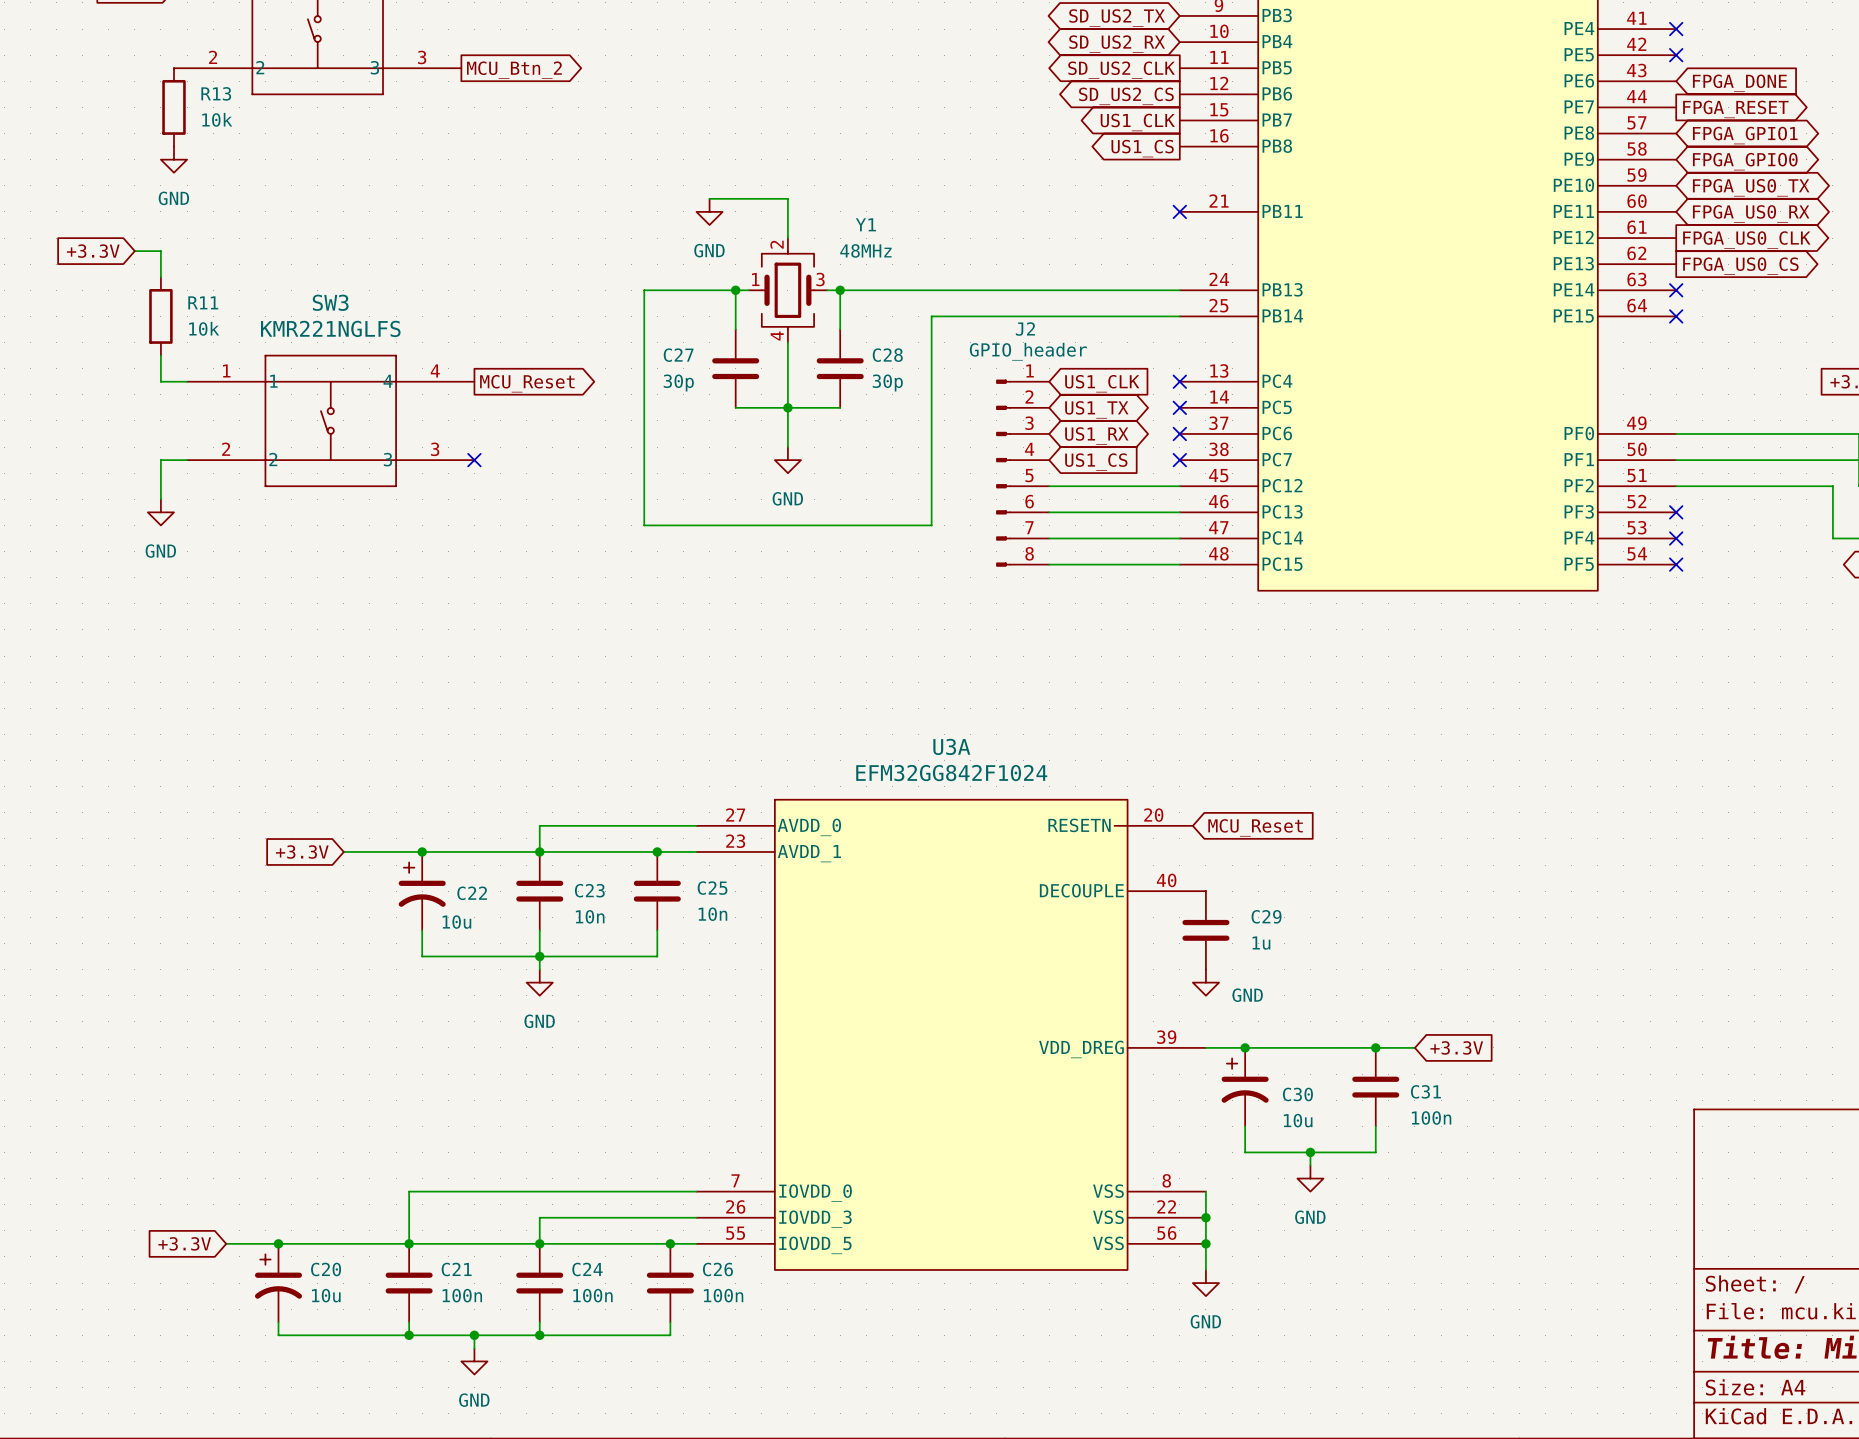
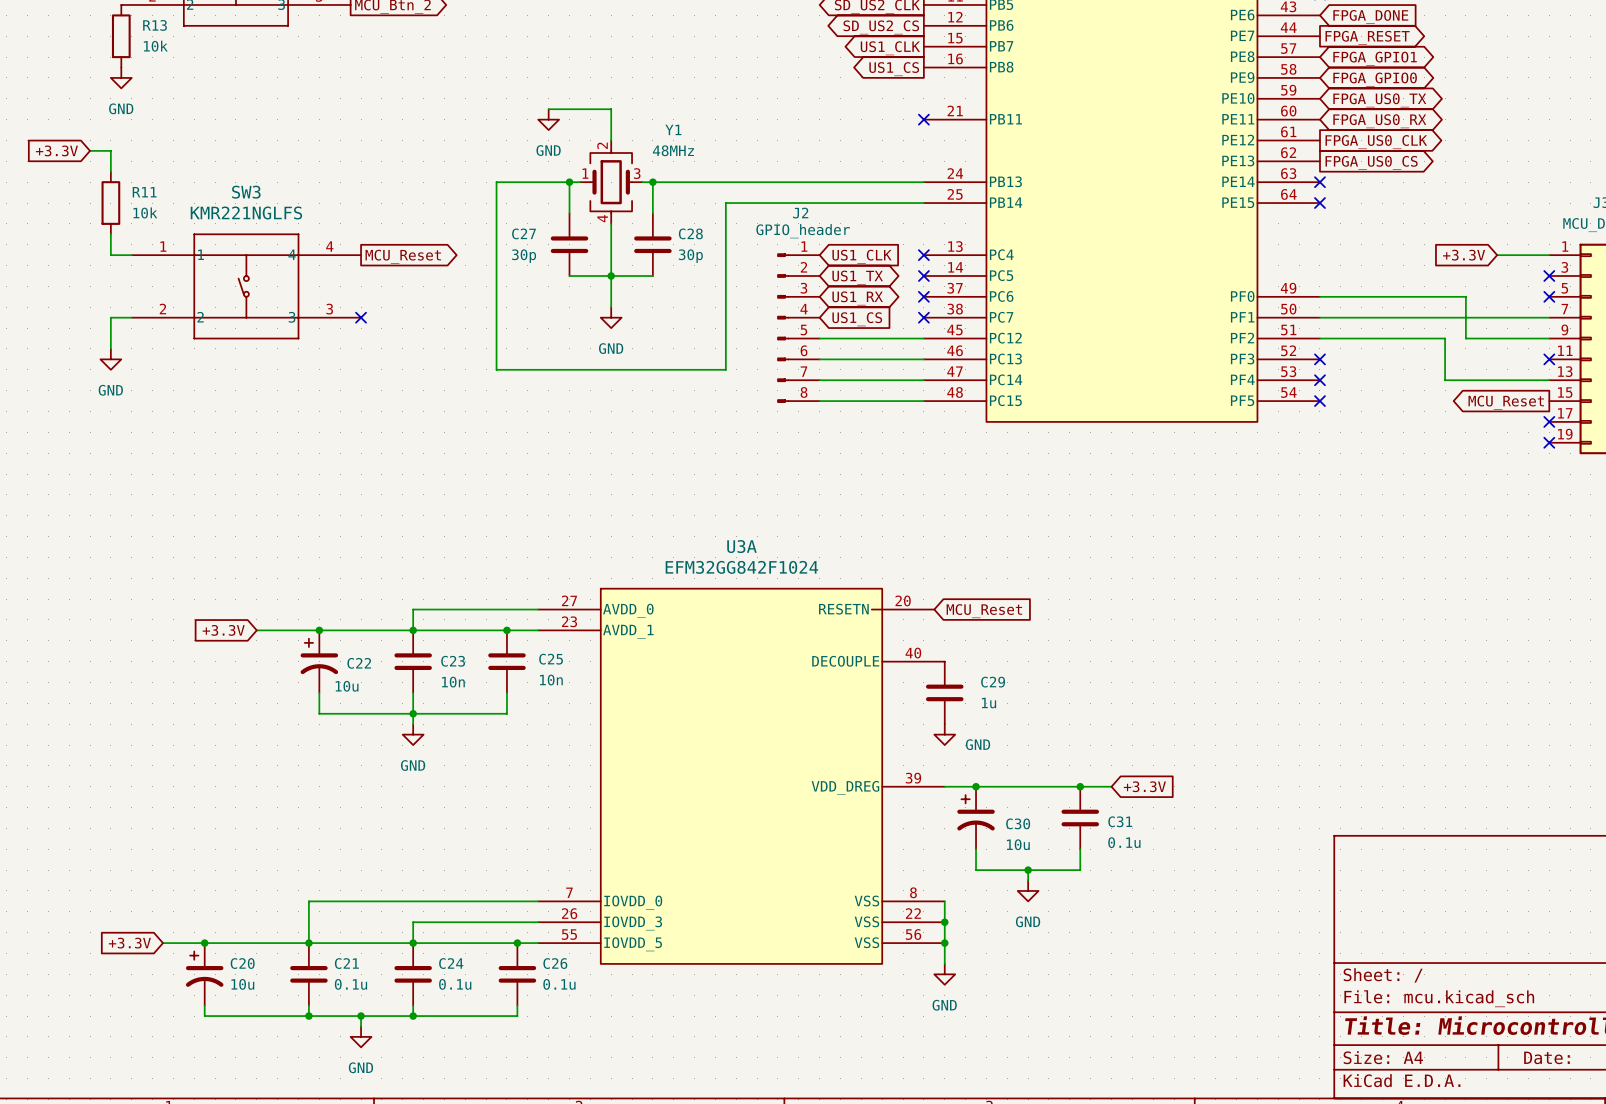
C31 value: 100n (1431, 1117) -> 0.1u (1124, 842)
C21 value: 100n (462, 1295) -> 0.1u (350, 984)
C24 value: 100n (592, 1295) -> 0.1u (455, 984)
C26 value: 100n (723, 1295) -> 0.1u (559, 984)

